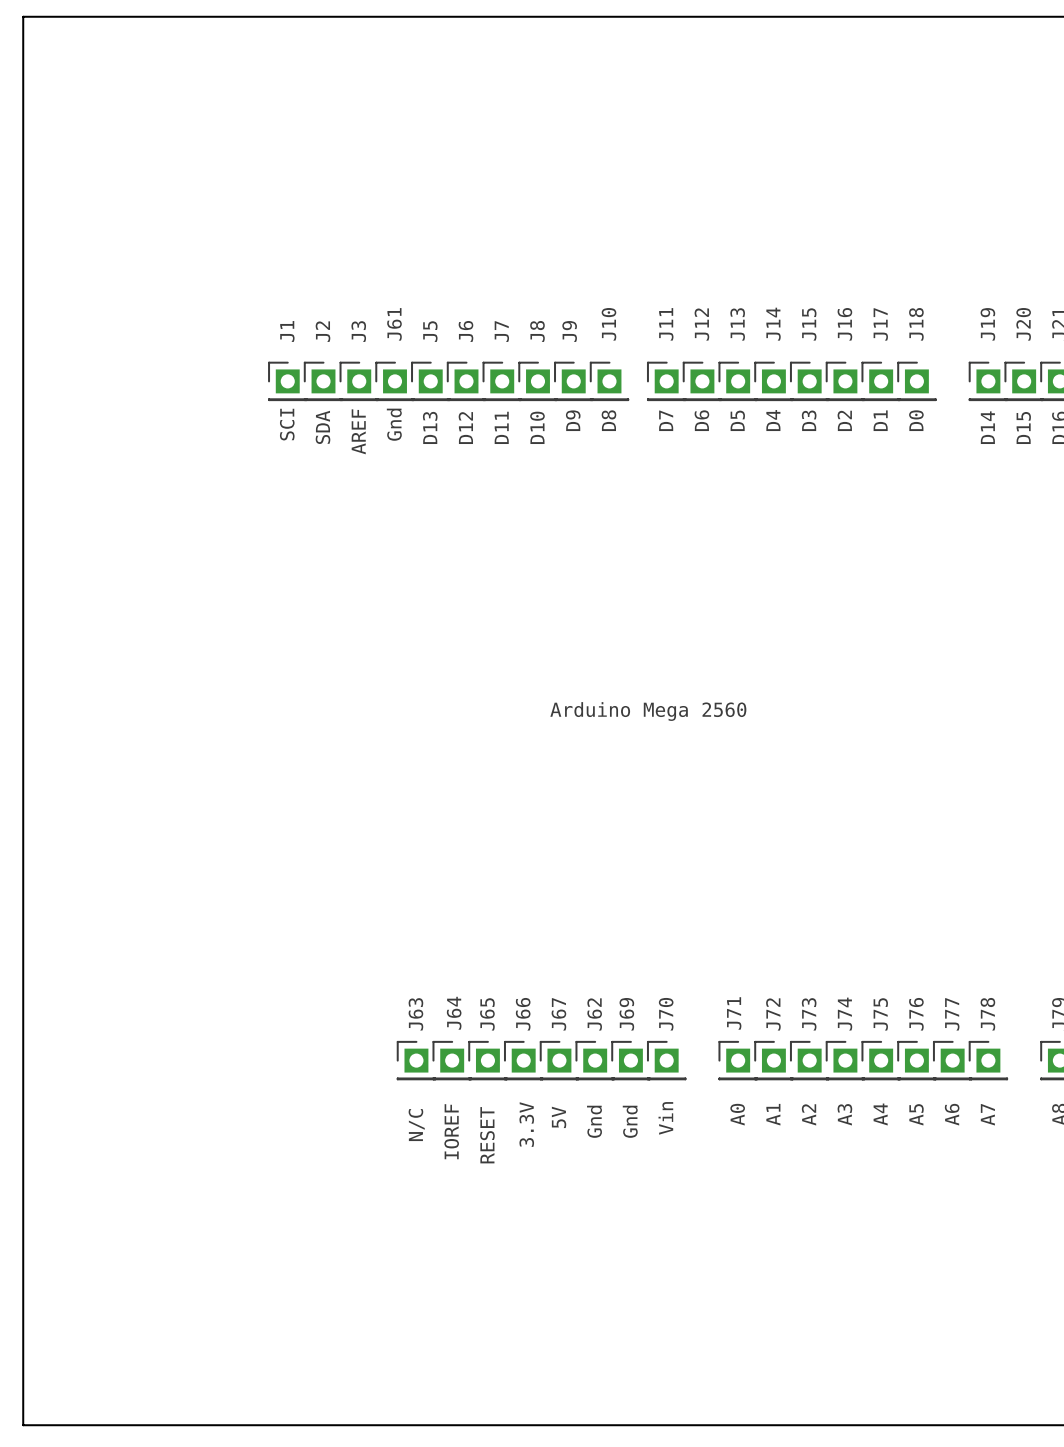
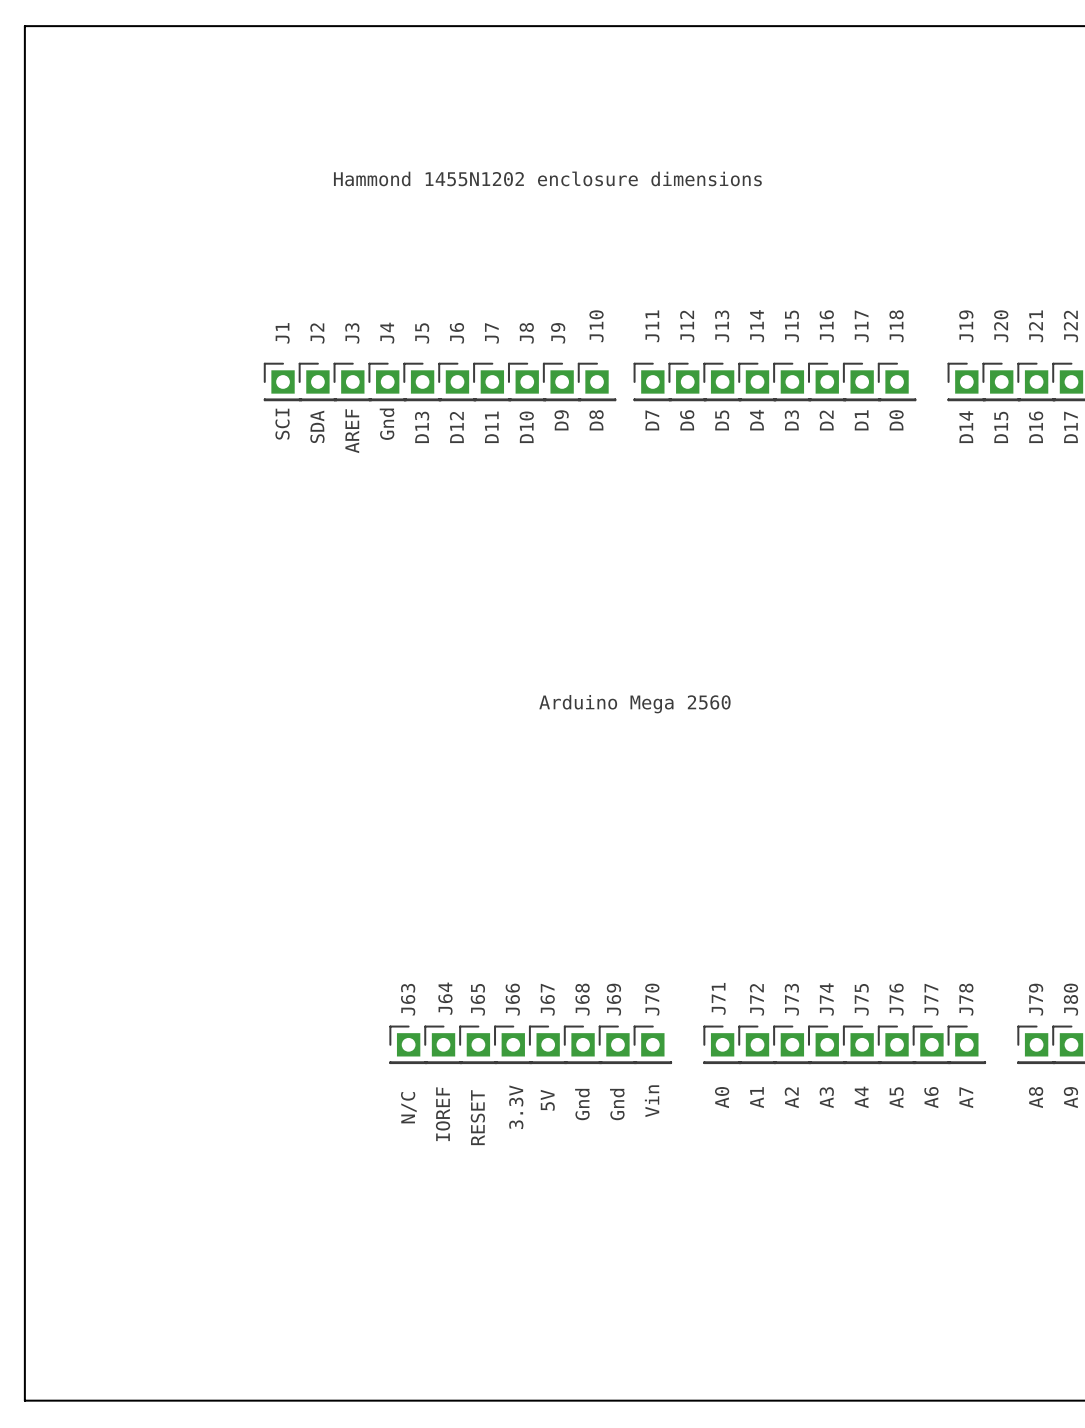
text: none -> Hammond 1455N1202 enclosure dimensions (547, 178)
J61 name: J61 (394, 324) -> J4 (387, 333)
J62 name: J62 (594, 1014) -> J68 (582, 999)

